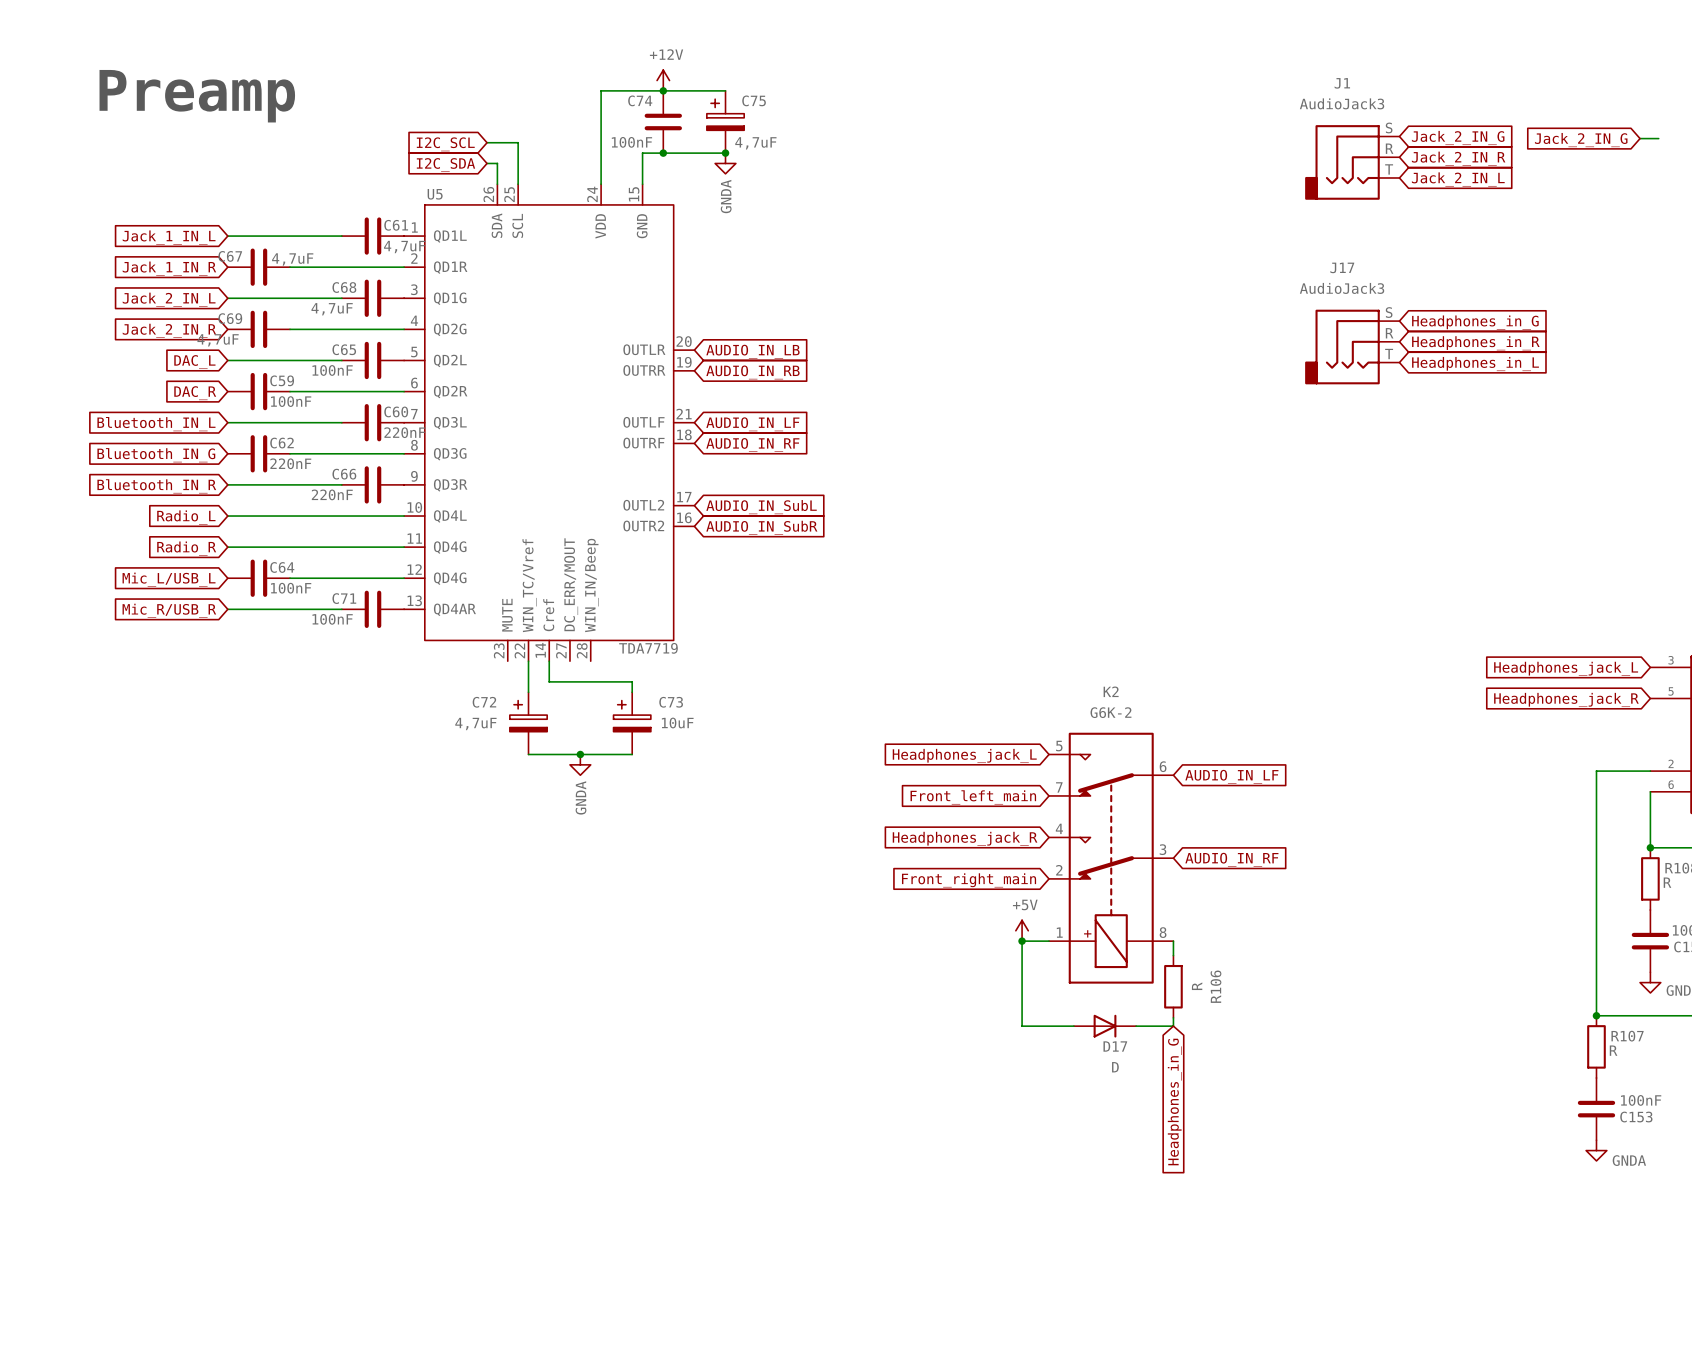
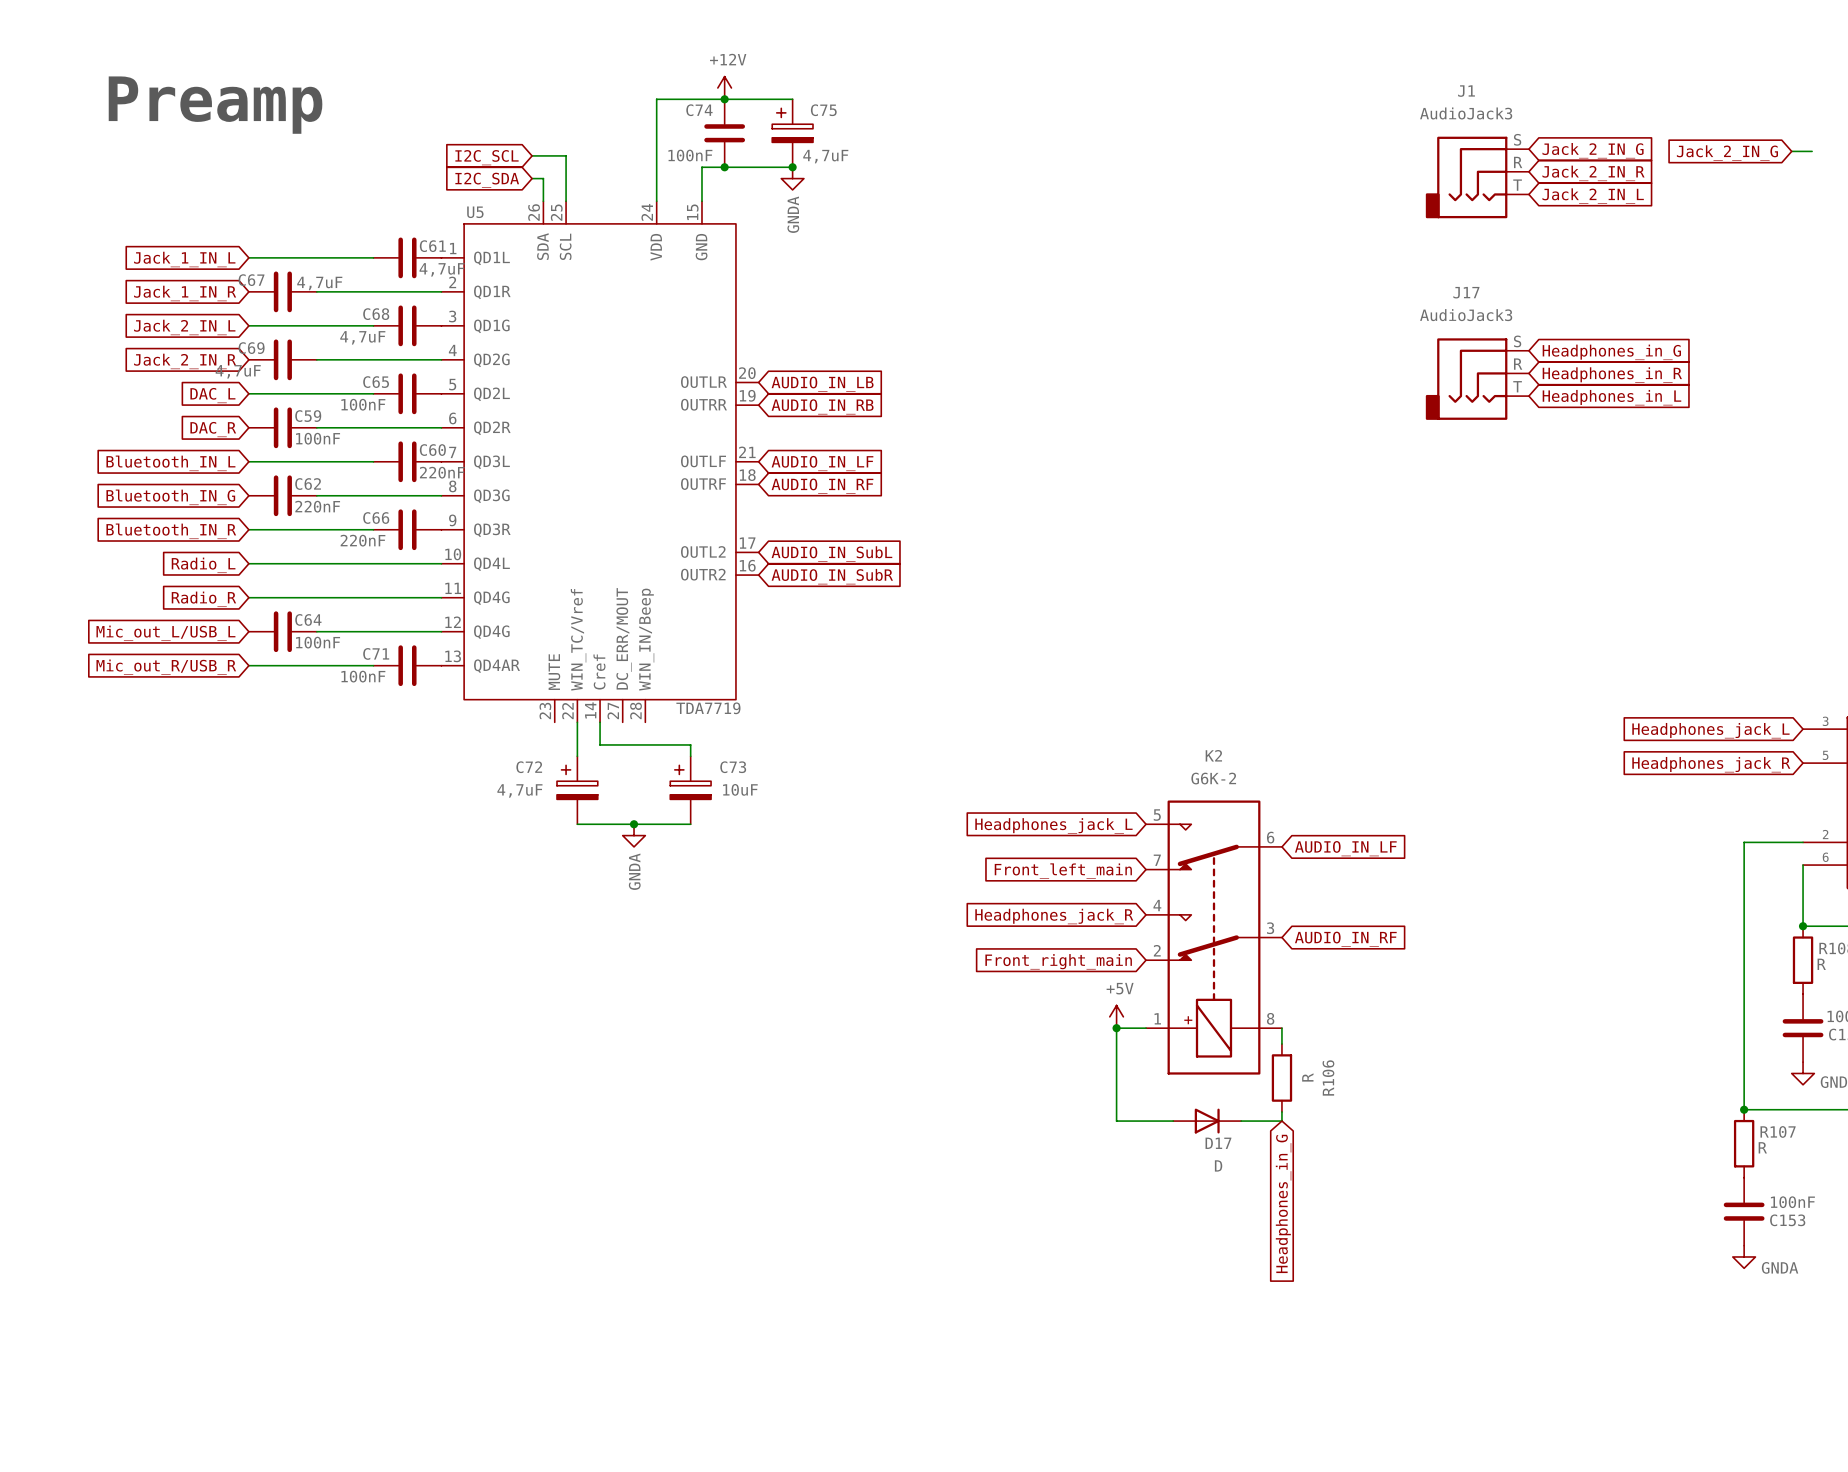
global label: Mic_L/USB_L (169, 579) -> Mic_out_L/USB_L (165, 633)
global label: Mic_R/USB_R (169, 610) -> Mic_out_R/USB_R (166, 667)

